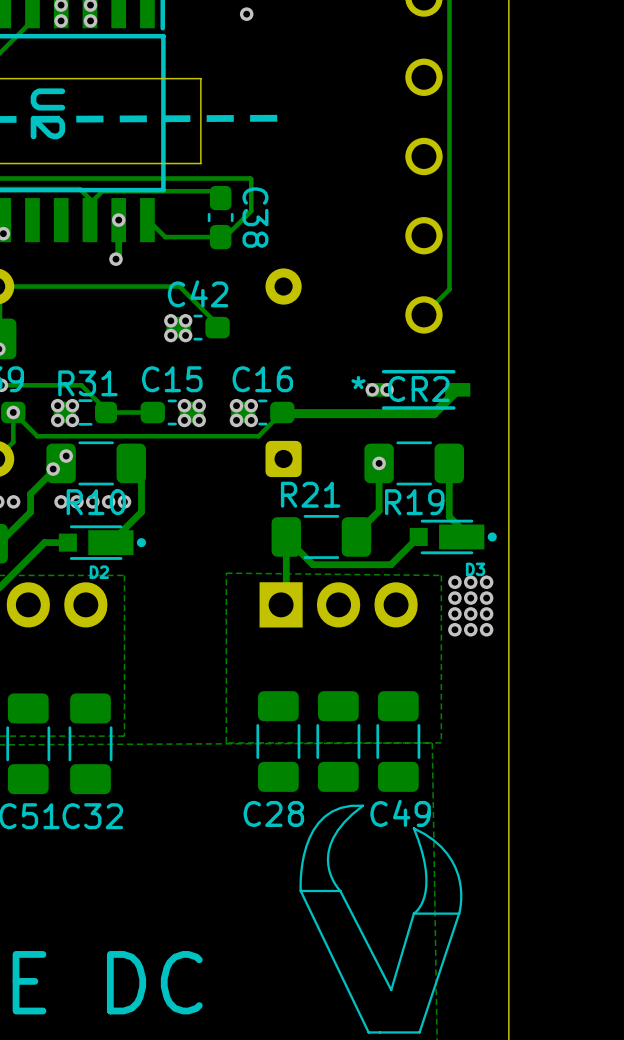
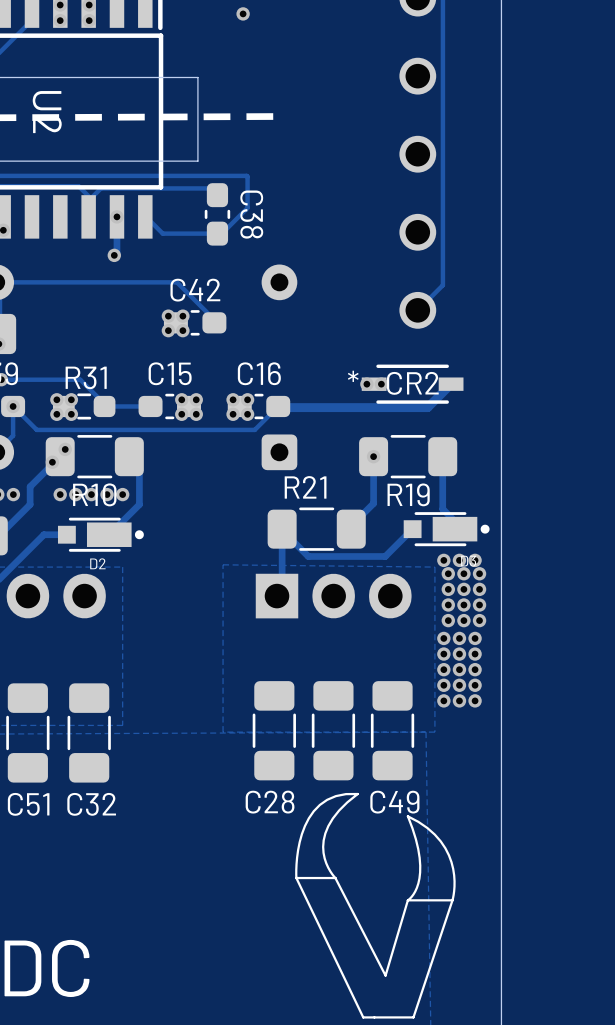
via: none -> (443, 560)
via: none -> (459, 560)
via: none -> (475, 560)
via: none -> (443, 638)
via: none -> (459, 638)
via: none -> (475, 638)
via: none -> (443, 654)
via: none -> (459, 654)
via: none -> (475, 654)
via: none -> (443, 669)
via: none -> (459, 669)
via: none -> (475, 669)
via: none -> (443, 685)
via: none -> (459, 685)
via: none -> (475, 685)
via: none -> (443, 700)
via: none -> (459, 700)
via: none -> (475, 700)

